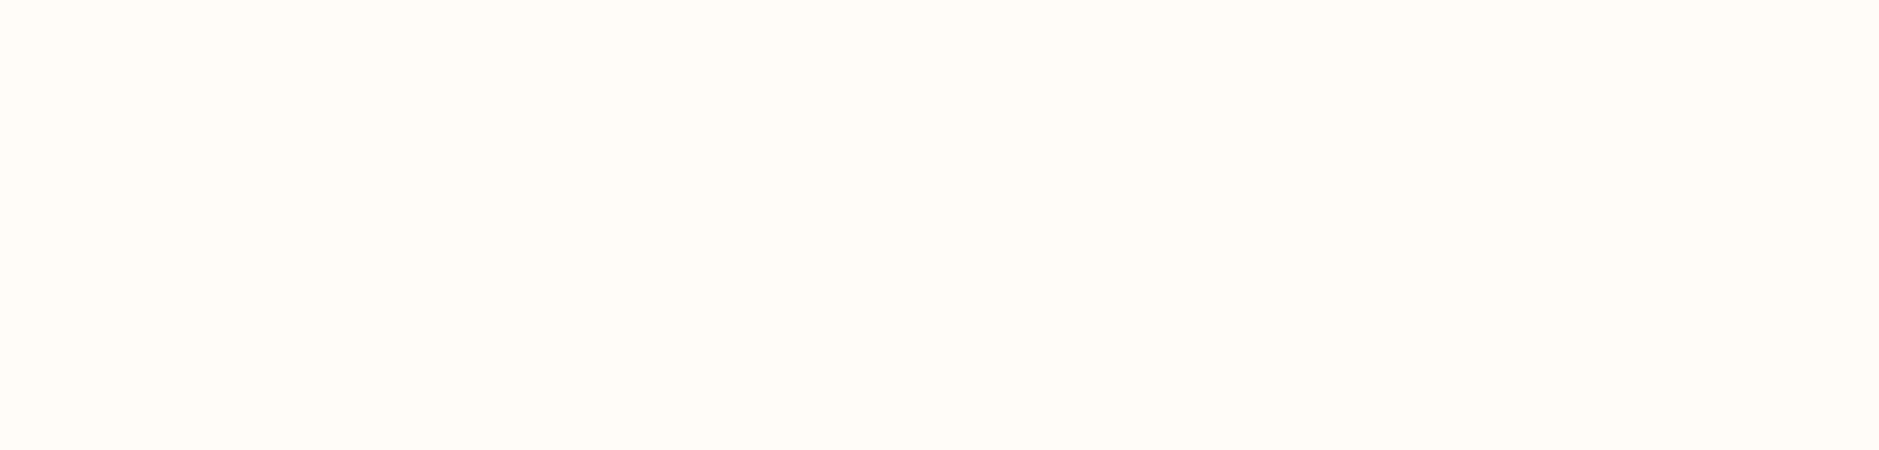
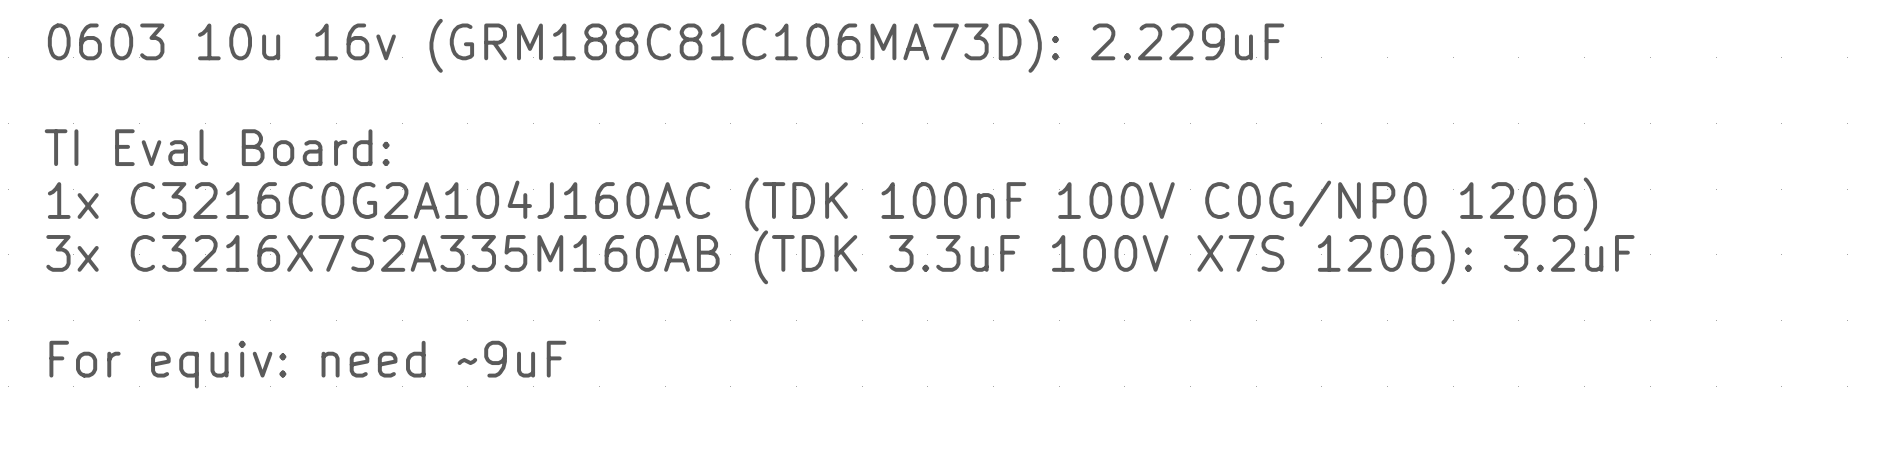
text: none -> 0603 10u 16v (GRM188C81C106MA73D): 2.229uF (666, 45)
text: none -> TI Eval Board: (217, 147)
text: none -> 1x C3216C0G2A104J160AC (TDK 100nF 100V C0G/NP0 1206) (822, 204)
text: none -> 3x C3216X7S2A335M160AB (TDK 3.3uF 100V X7S 1206): 3.2uF (840, 257)
text: none -> For equiv: need ~9uF (307, 364)

